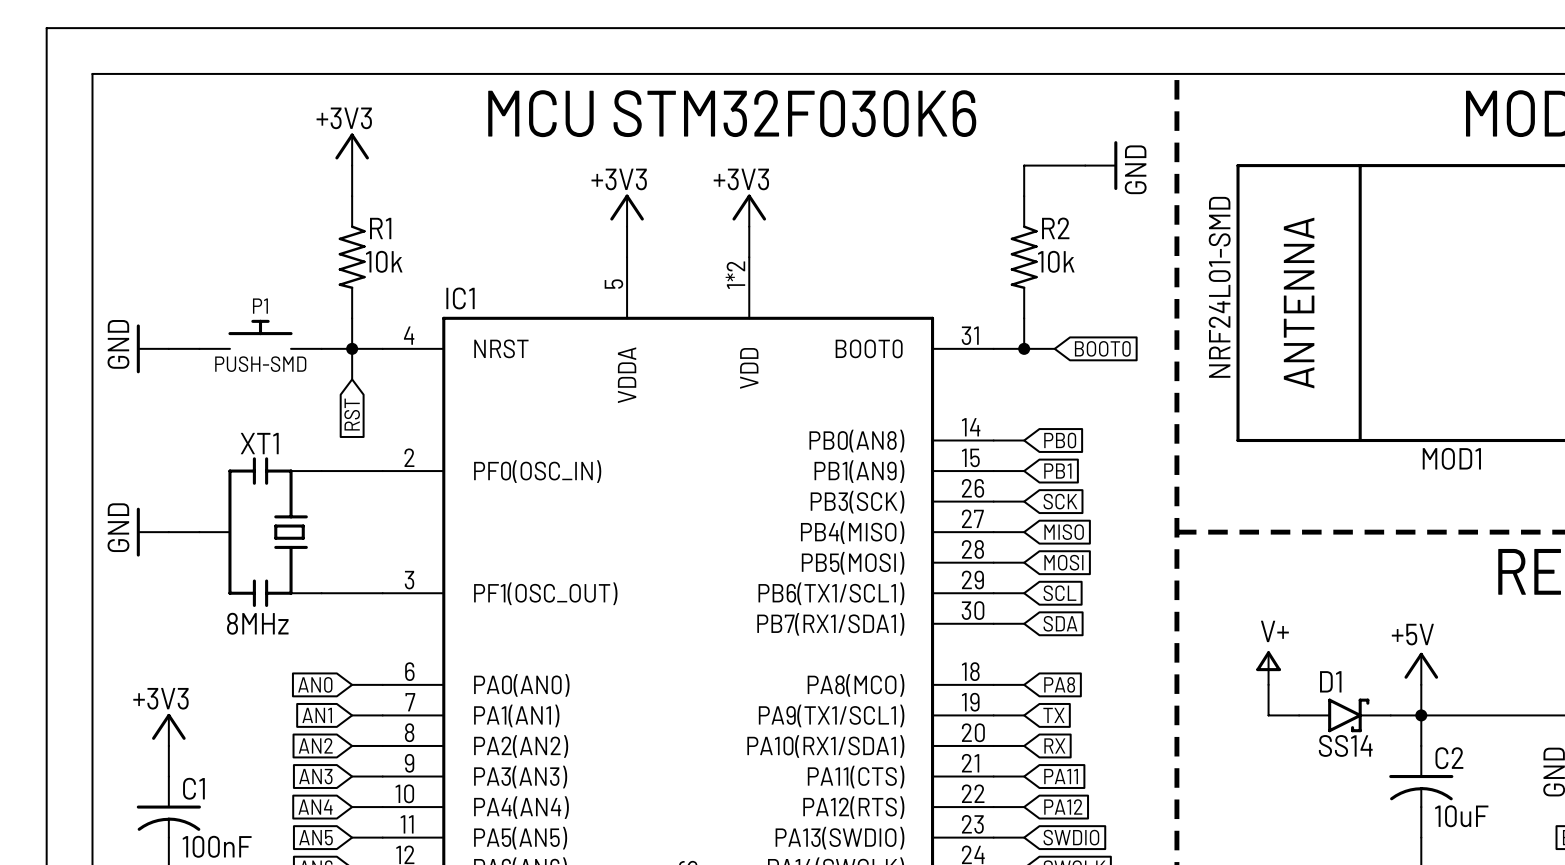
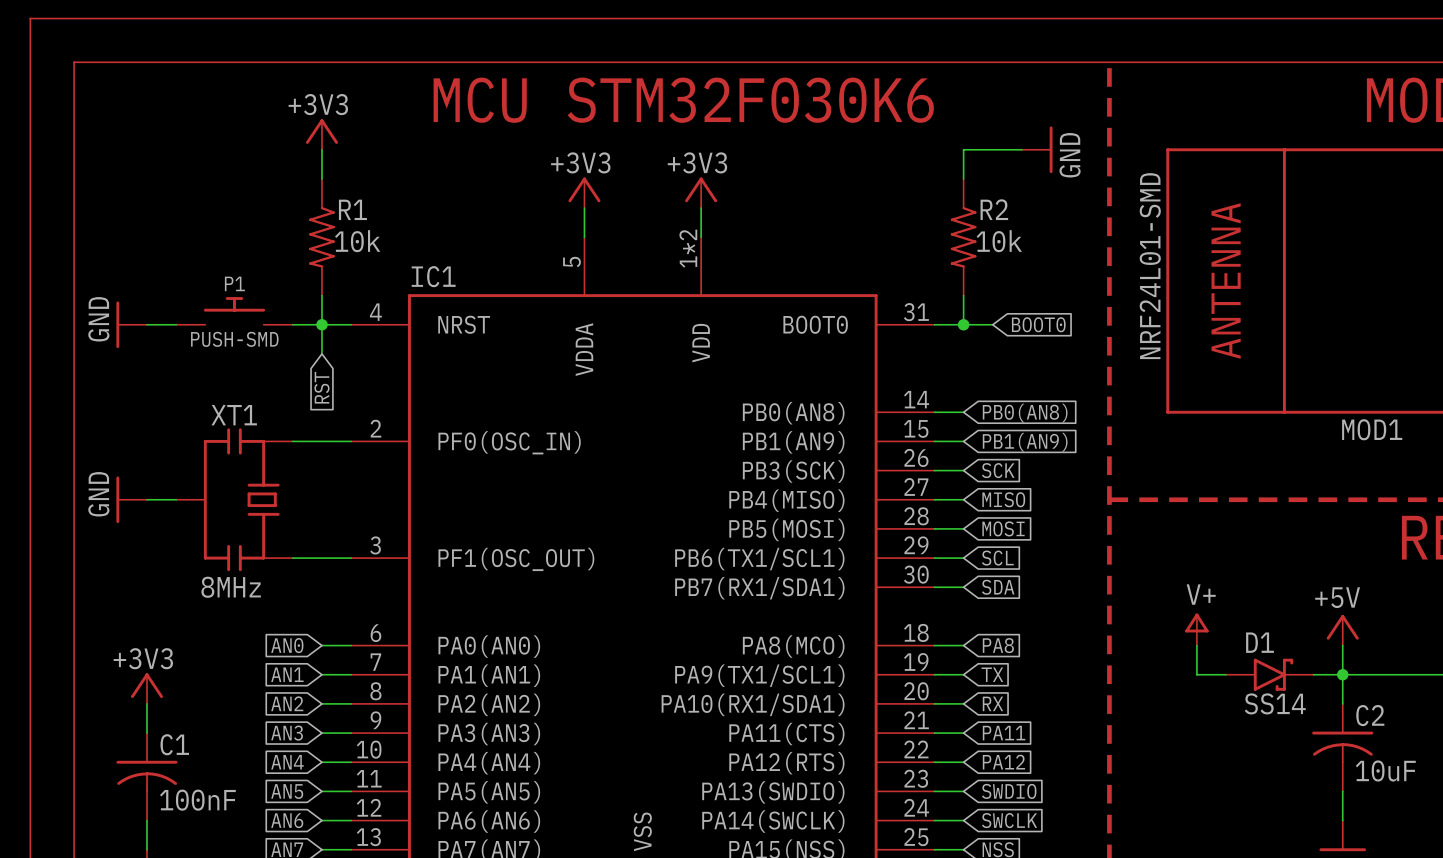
global label: PB0 (1060, 440) -> PB0(AN8) (1025, 413)
global label: PB1 (1057, 471) -> PB1(AN9) (1025, 442)

